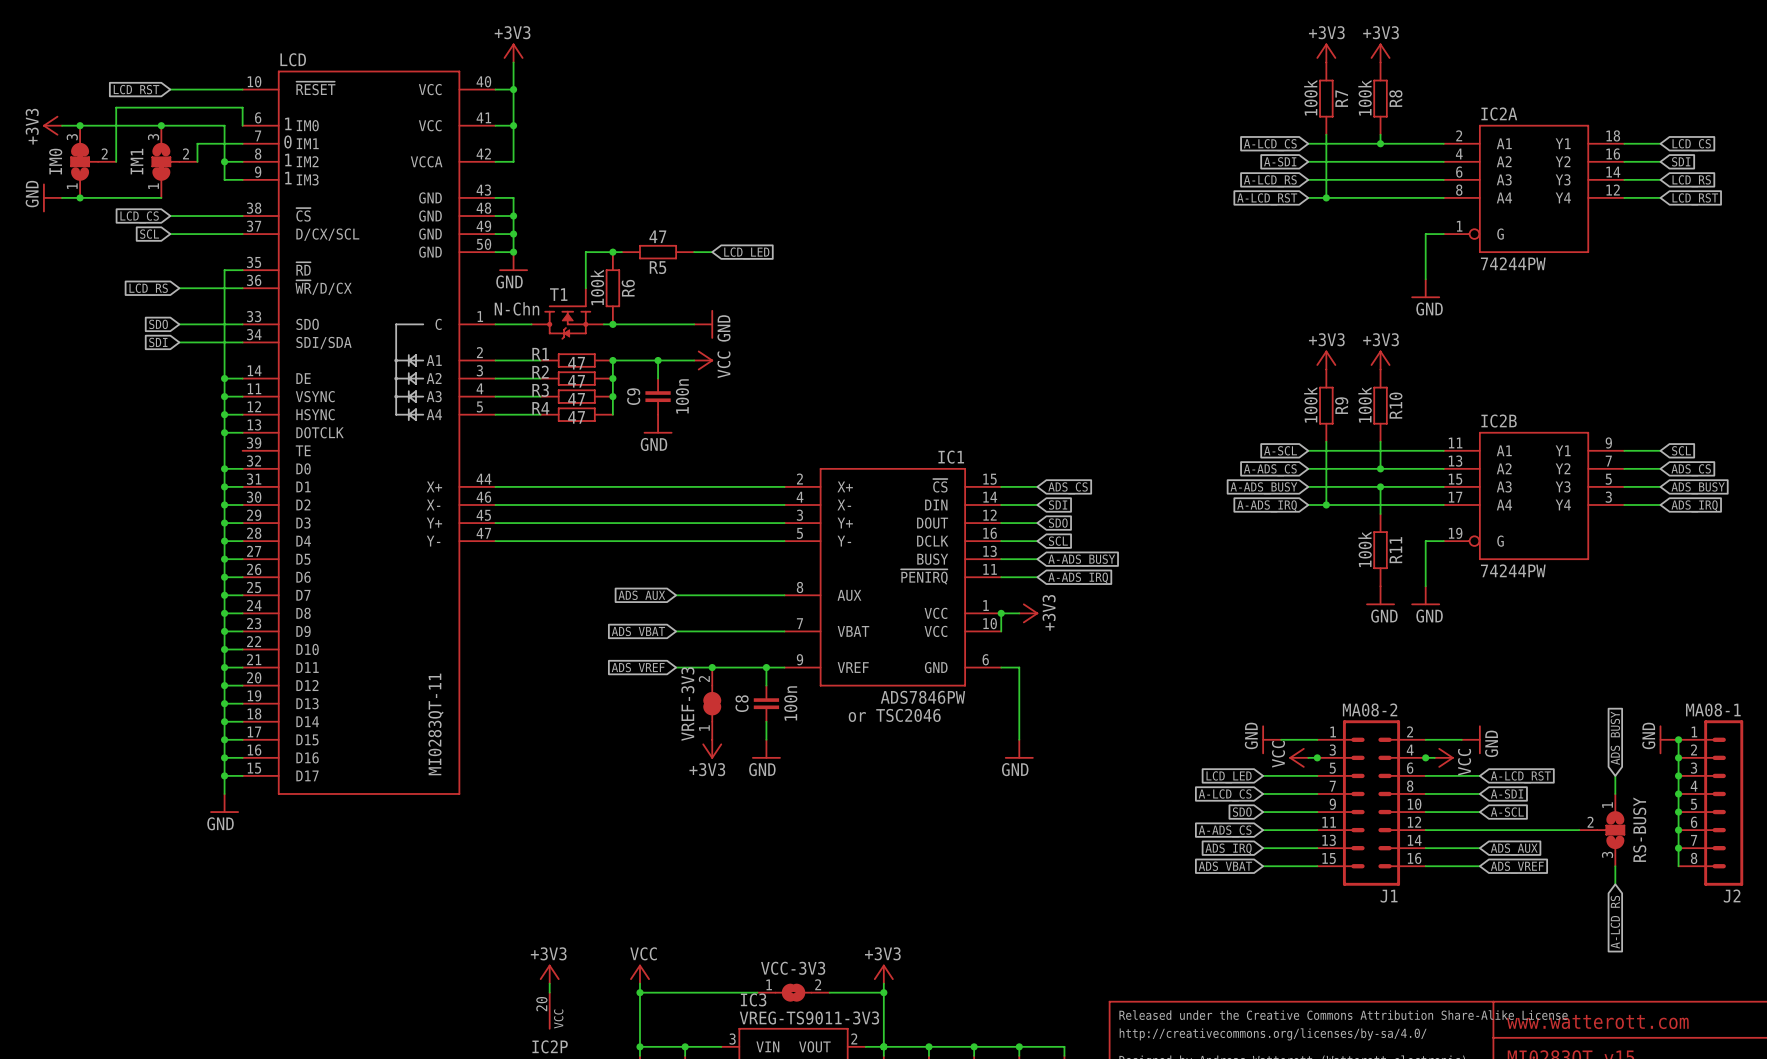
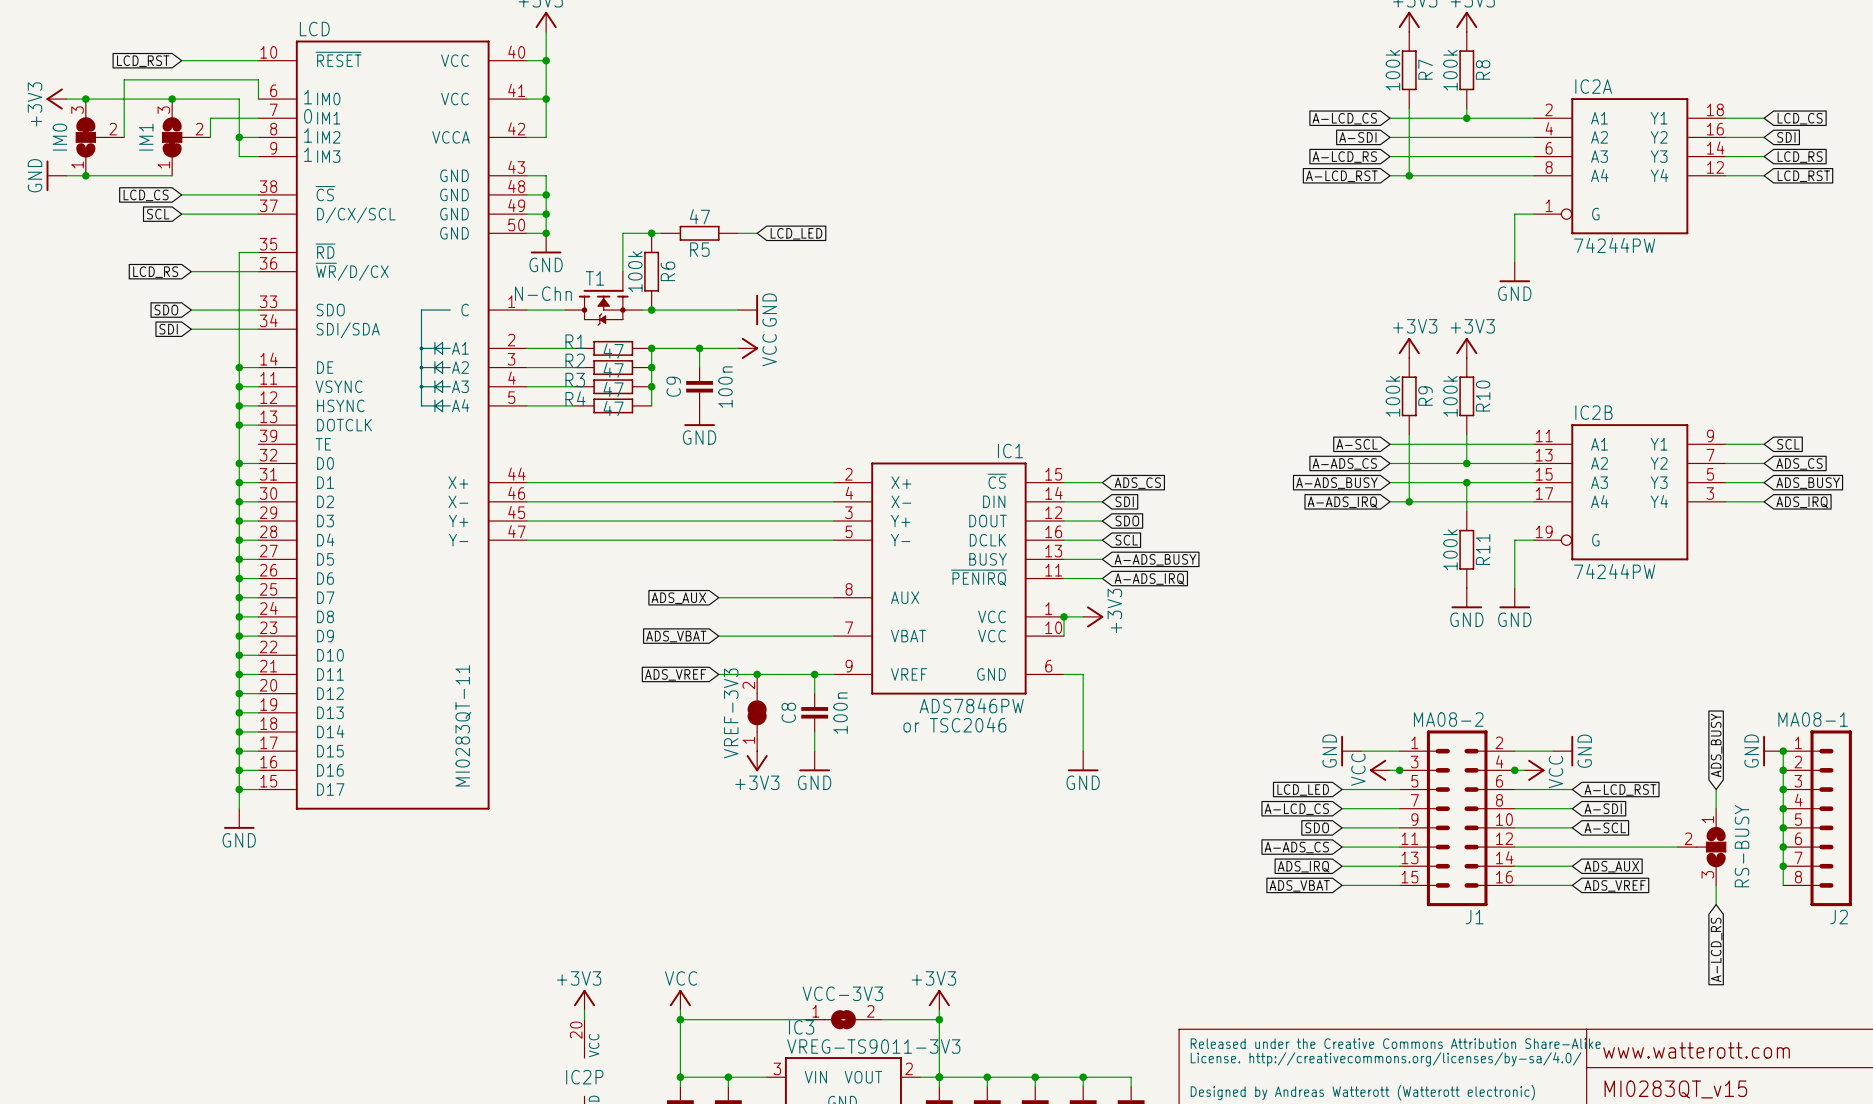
text: Released under the Creative Commons Attribution Share-Alike License (1343, 1015) -> License. http://creativecommons.org/licenses/by-sa/4.0/ (1386, 1059)
text: http://creativecommons.org/licenses/by-sa/4.0/ (1273, 1034) -> none

